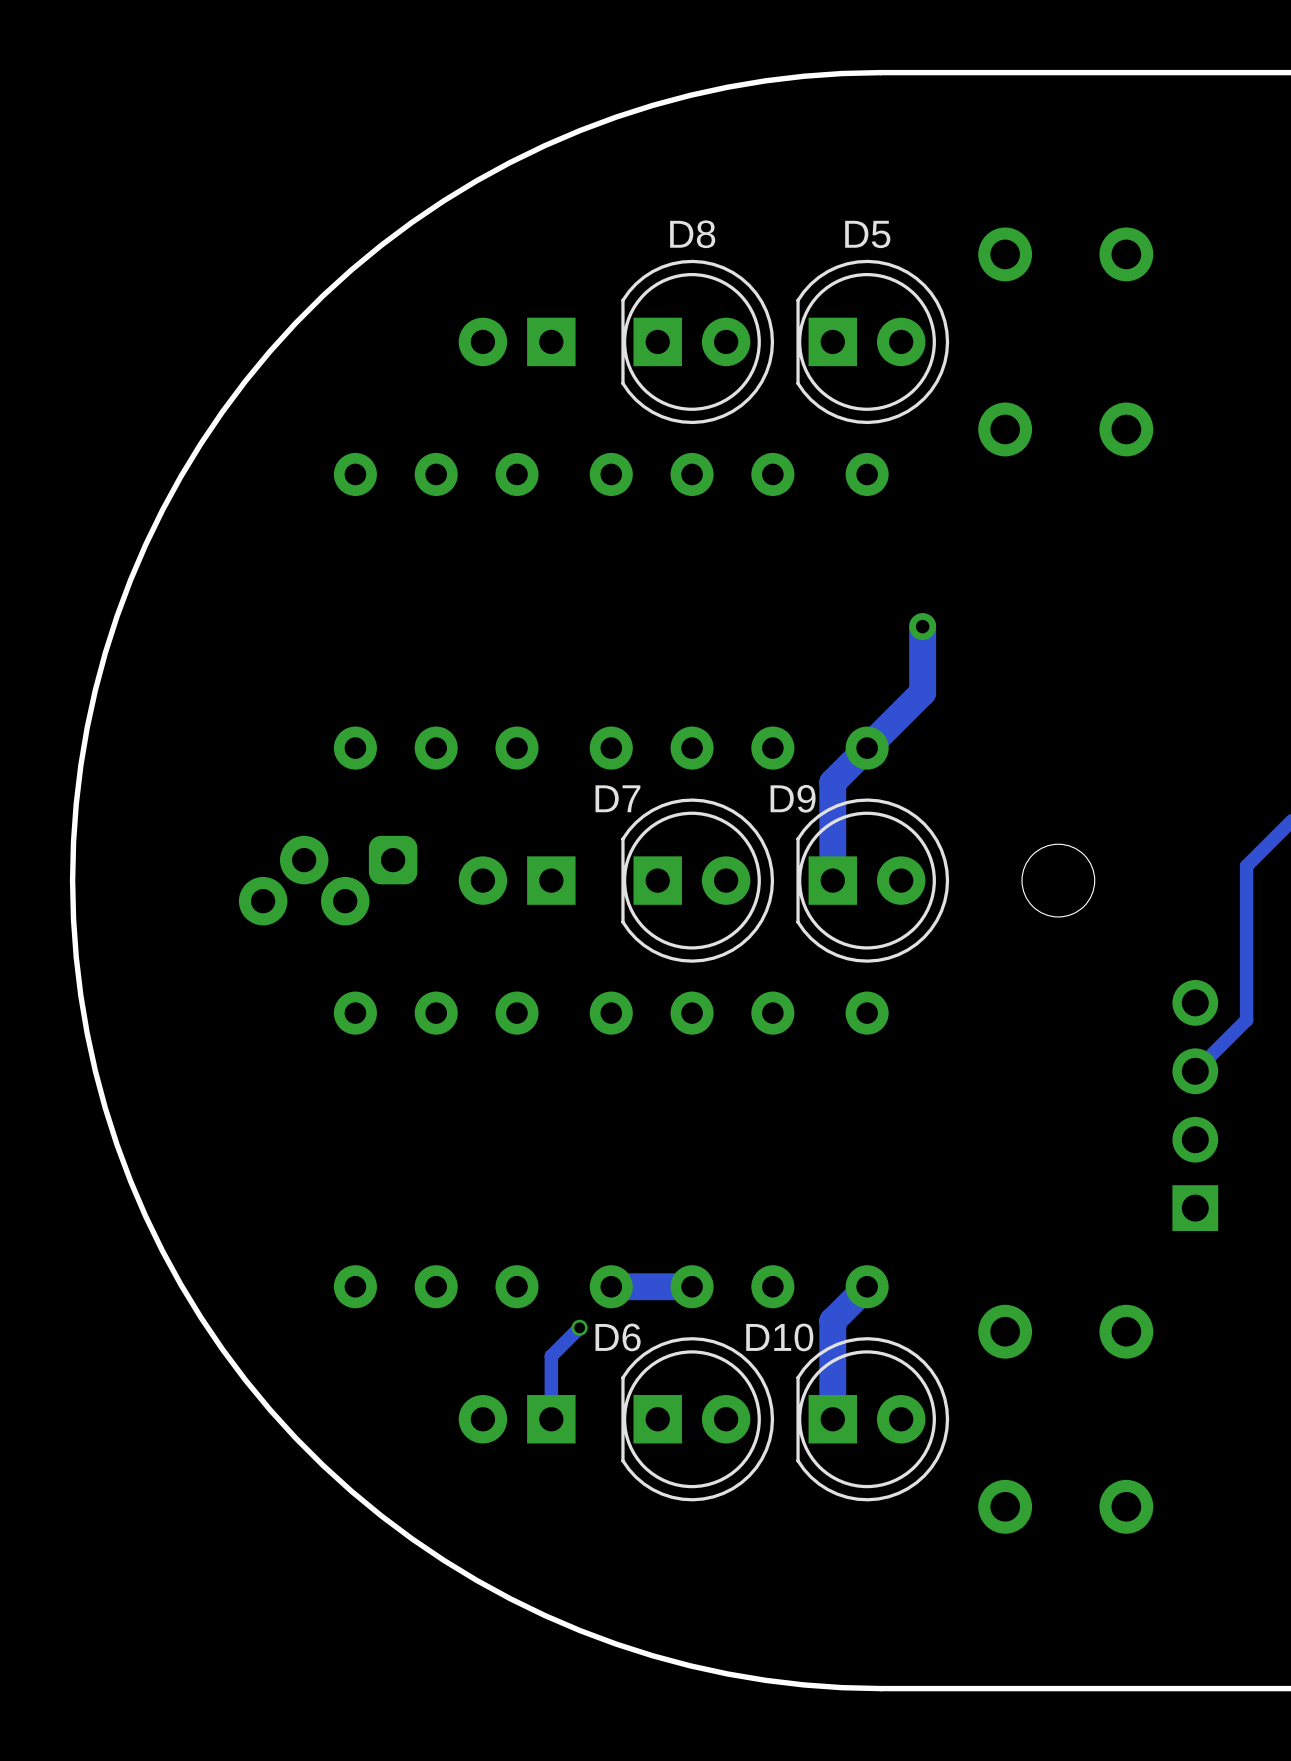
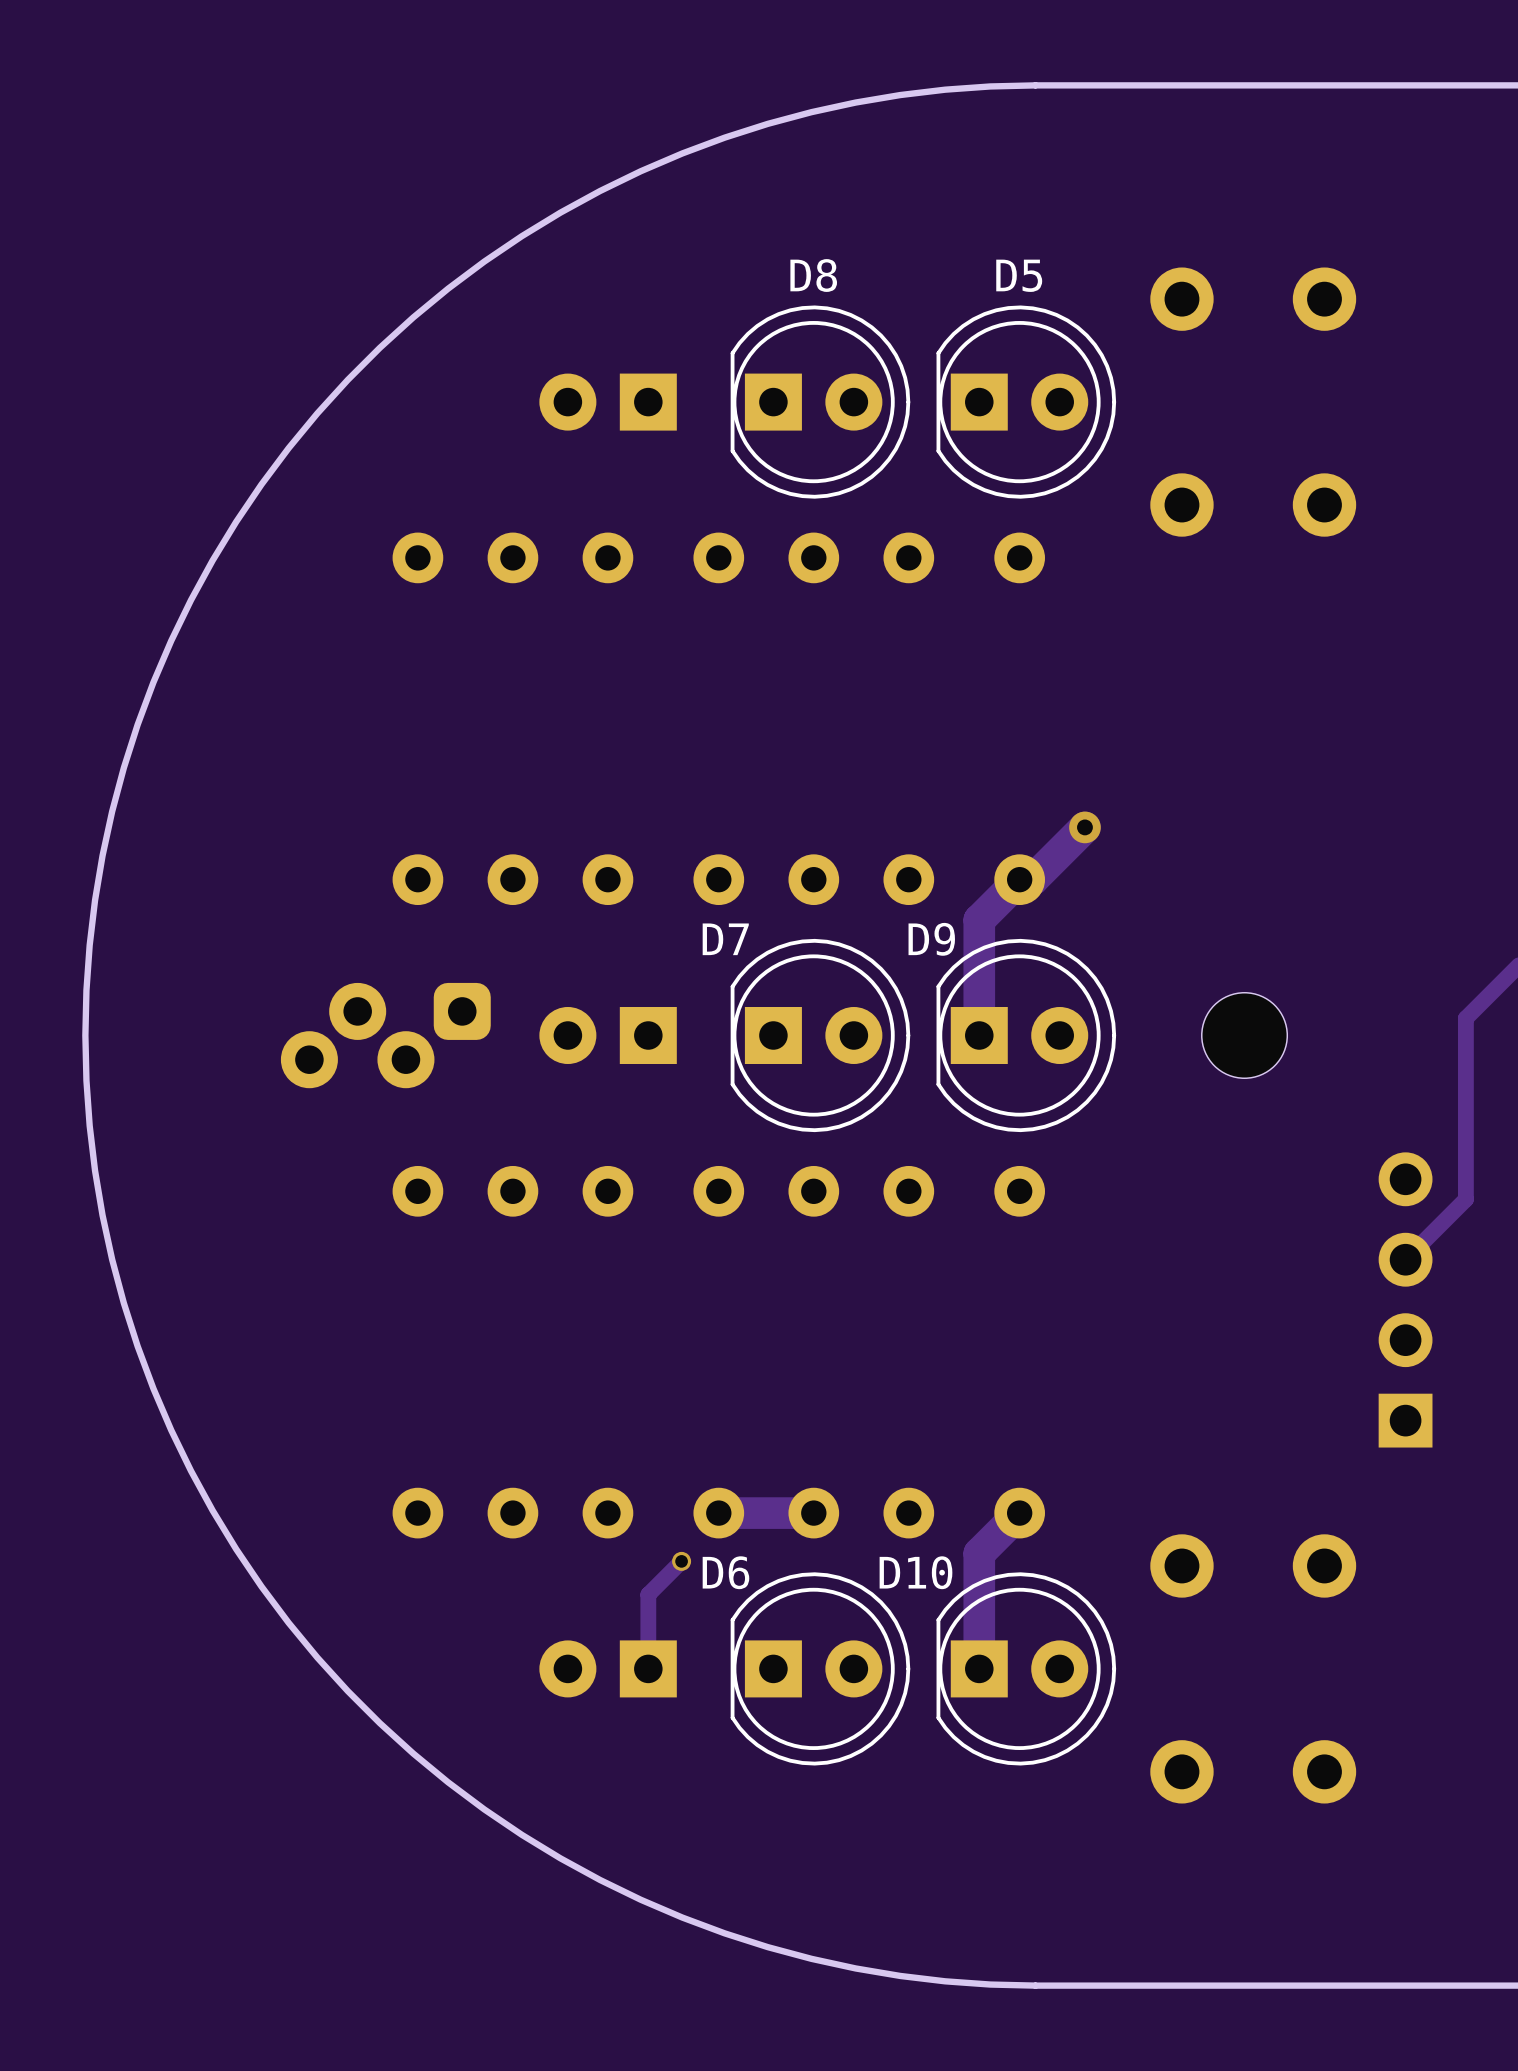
track: (922, 626) (922, 692) (867, 748) -> (1084, 827) (1032, 879) (1019, 879)
via position: (922, 626) -> (1084, 827)

